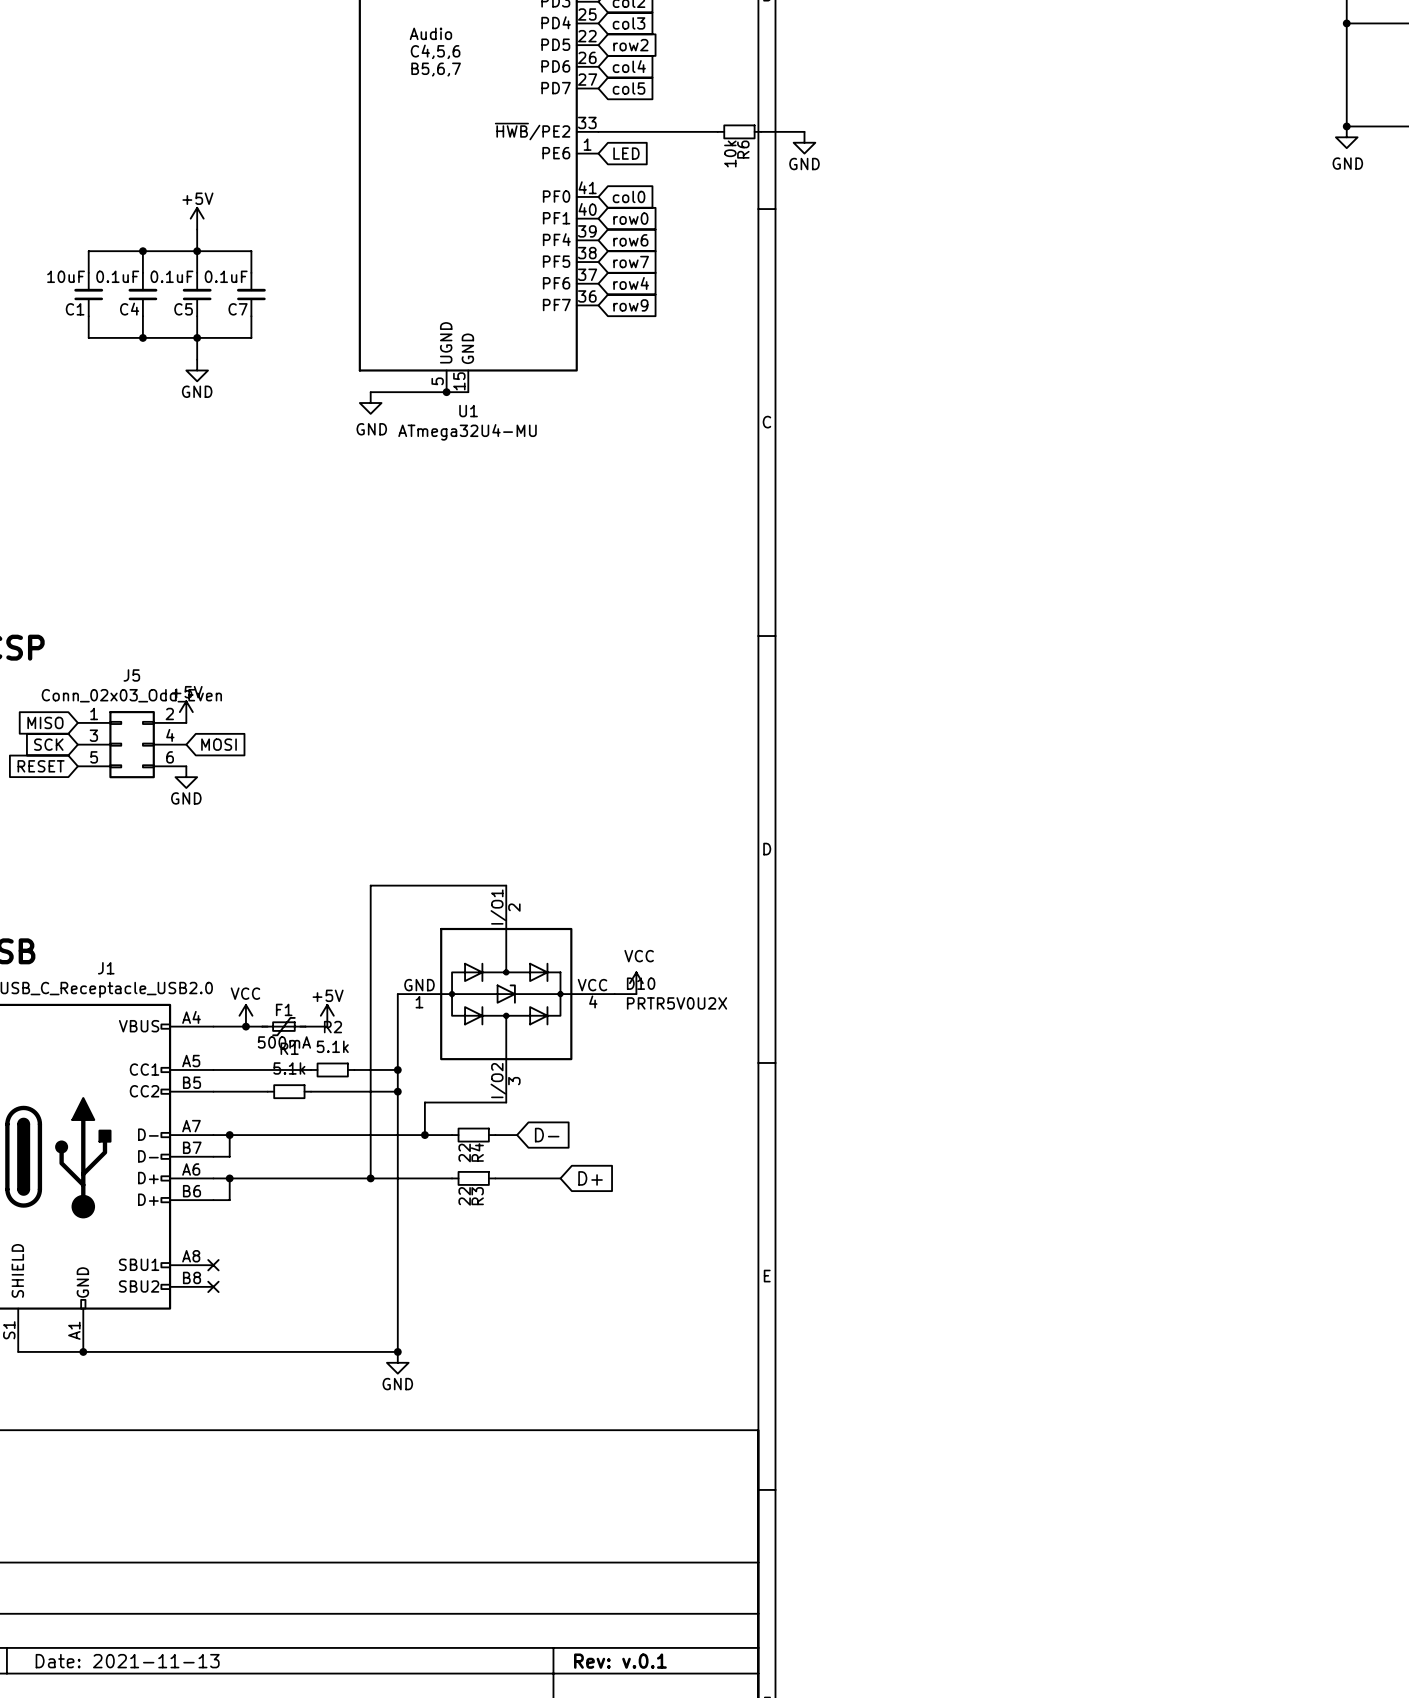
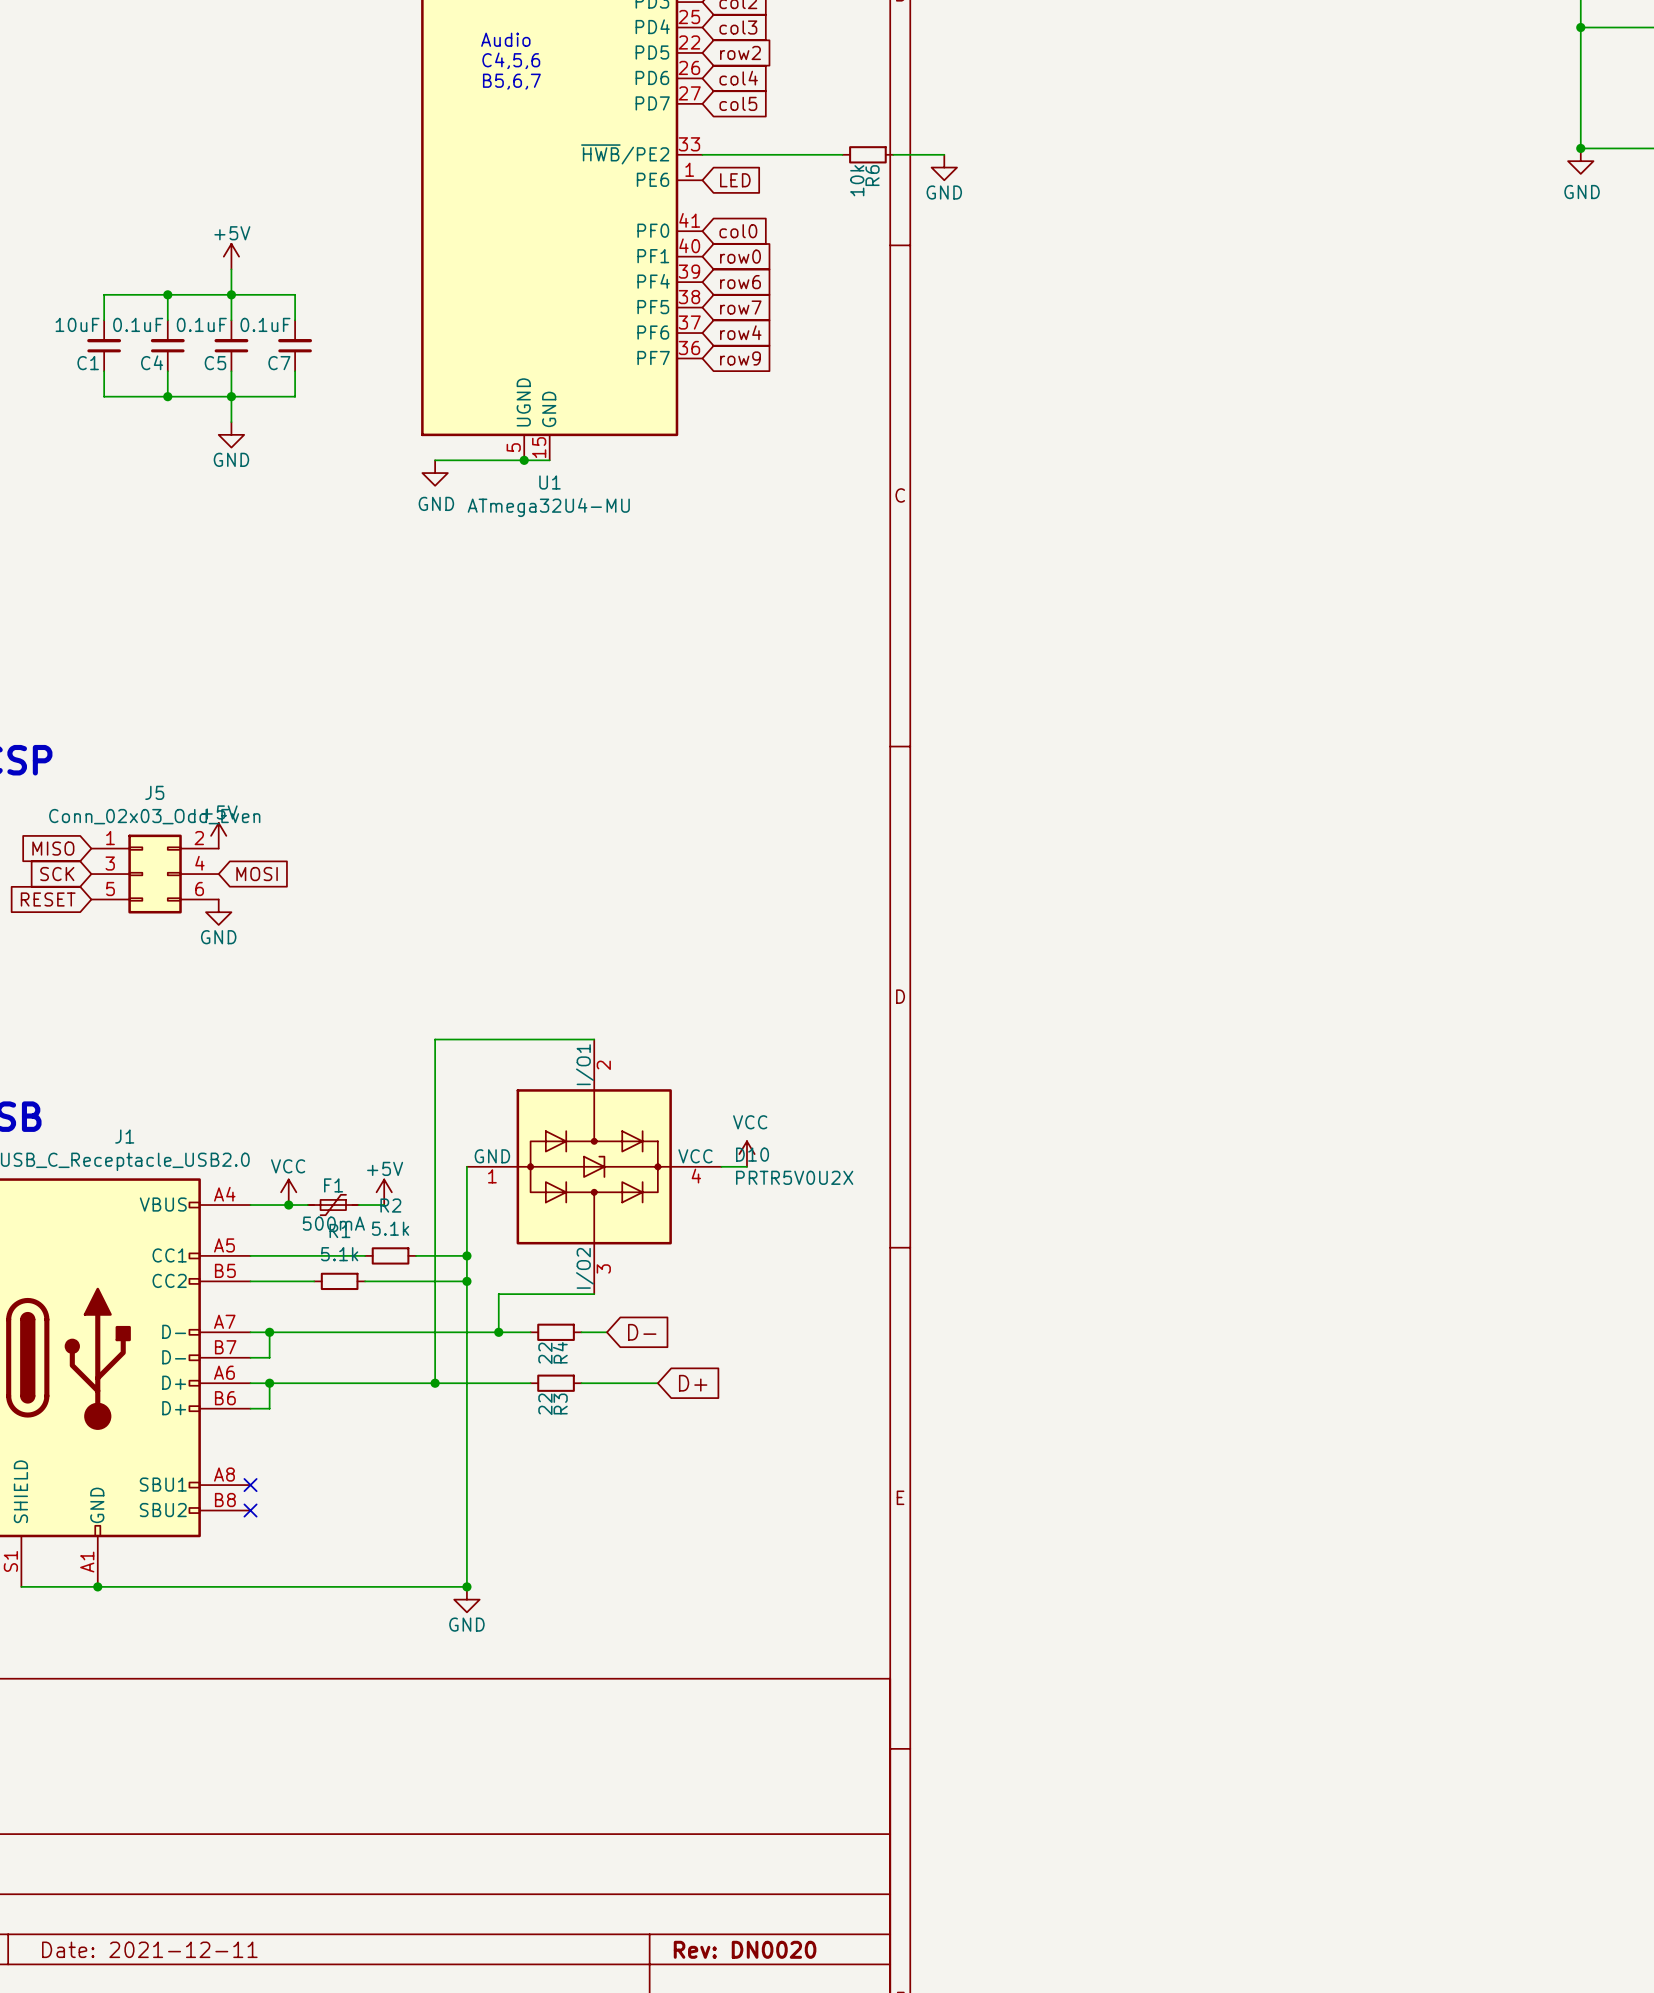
title block: Date: 2021-11-13 (127, 1661) -> Date: 2021-12-11 (149, 1949)
title block: Rev: v.0.1 (620, 1661) -> Rev: DN0020 (745, 1949)

